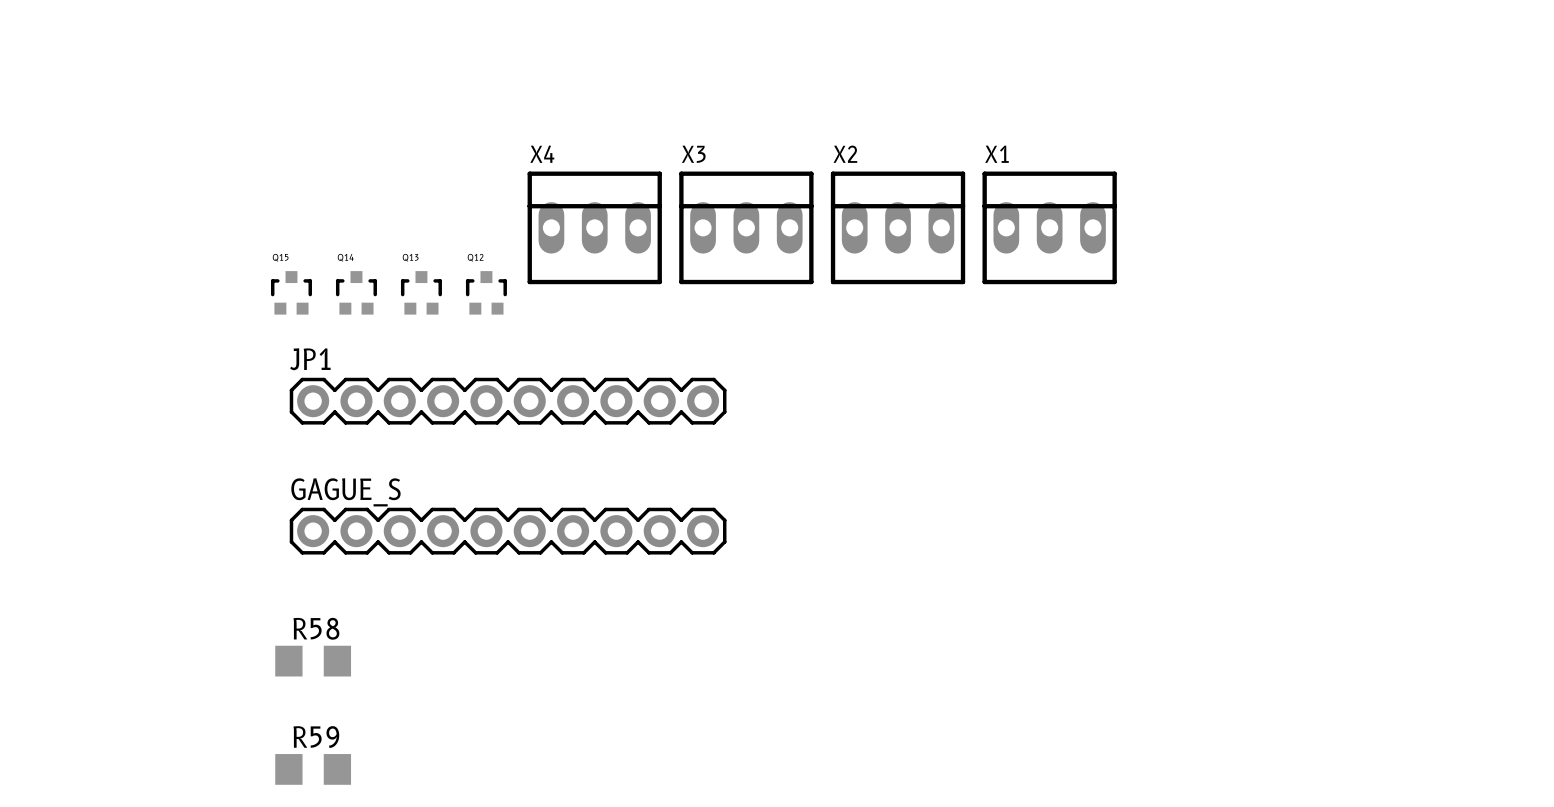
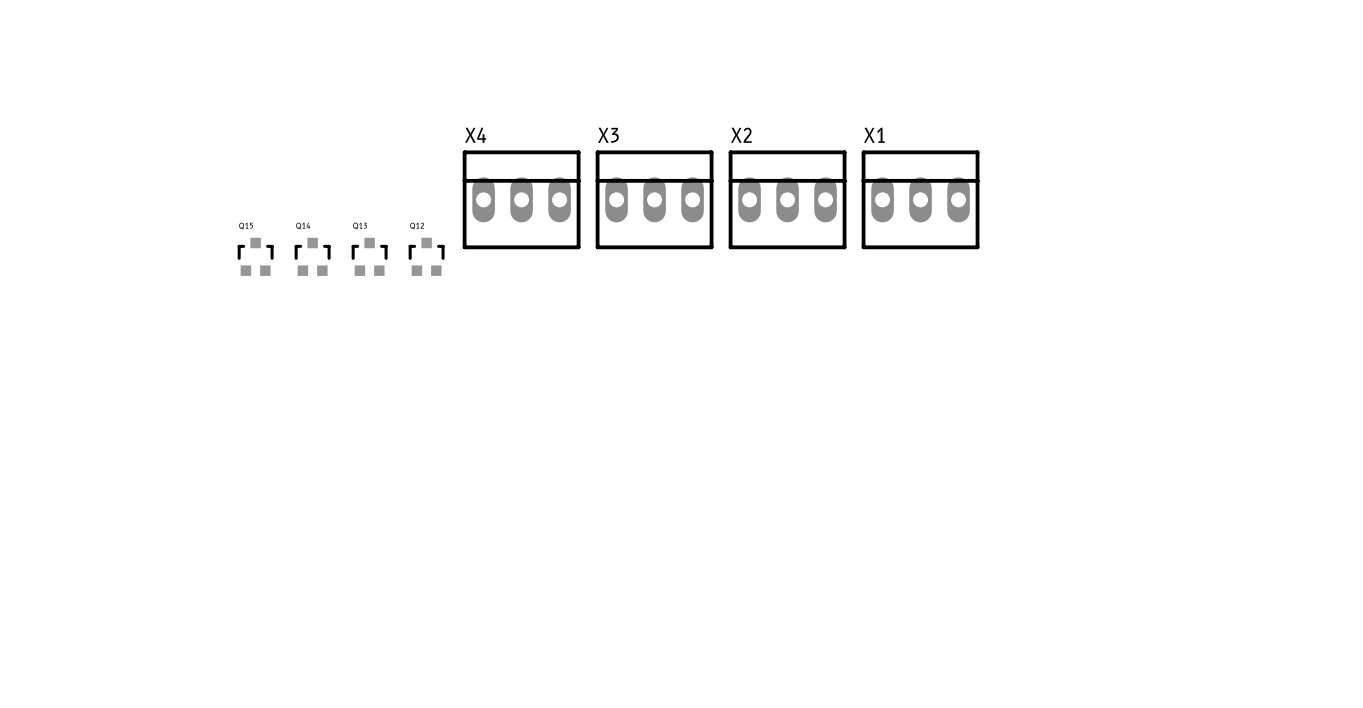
JP1: (508, 401) -> none
GAGUE_S: (508, 531) -> none
R58: (313, 661) -> none
R59: (313, 769) -> none

